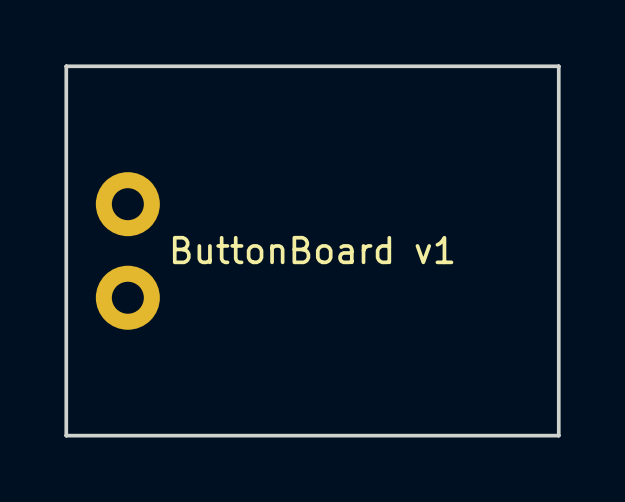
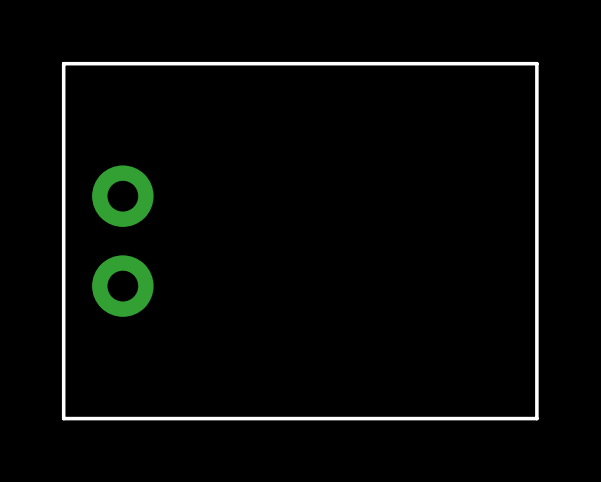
text: ButtonBoard v1 (313, 250) -> none

